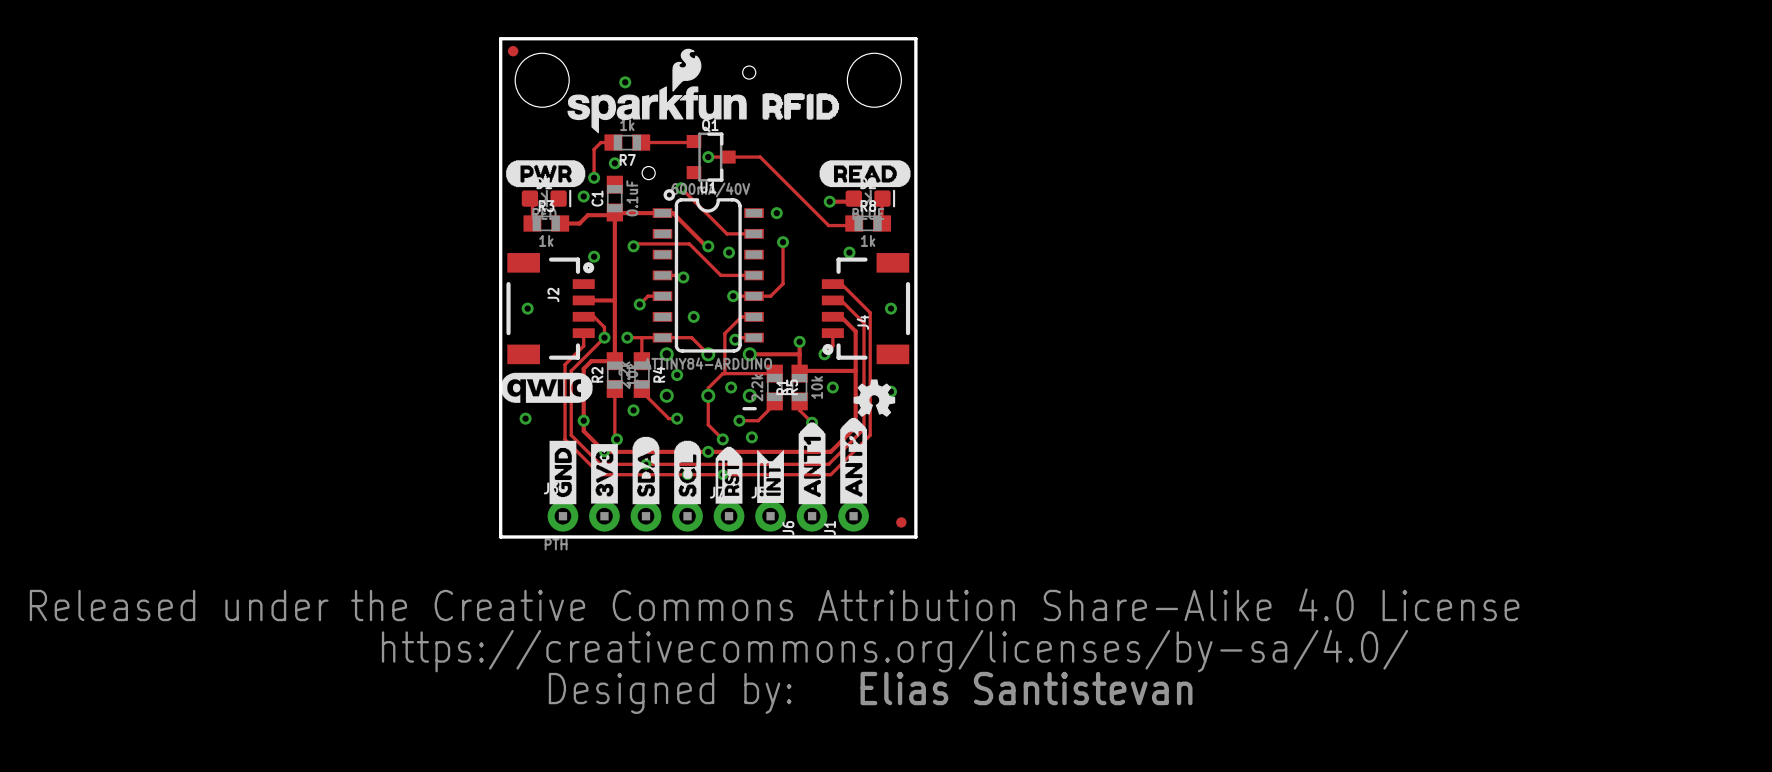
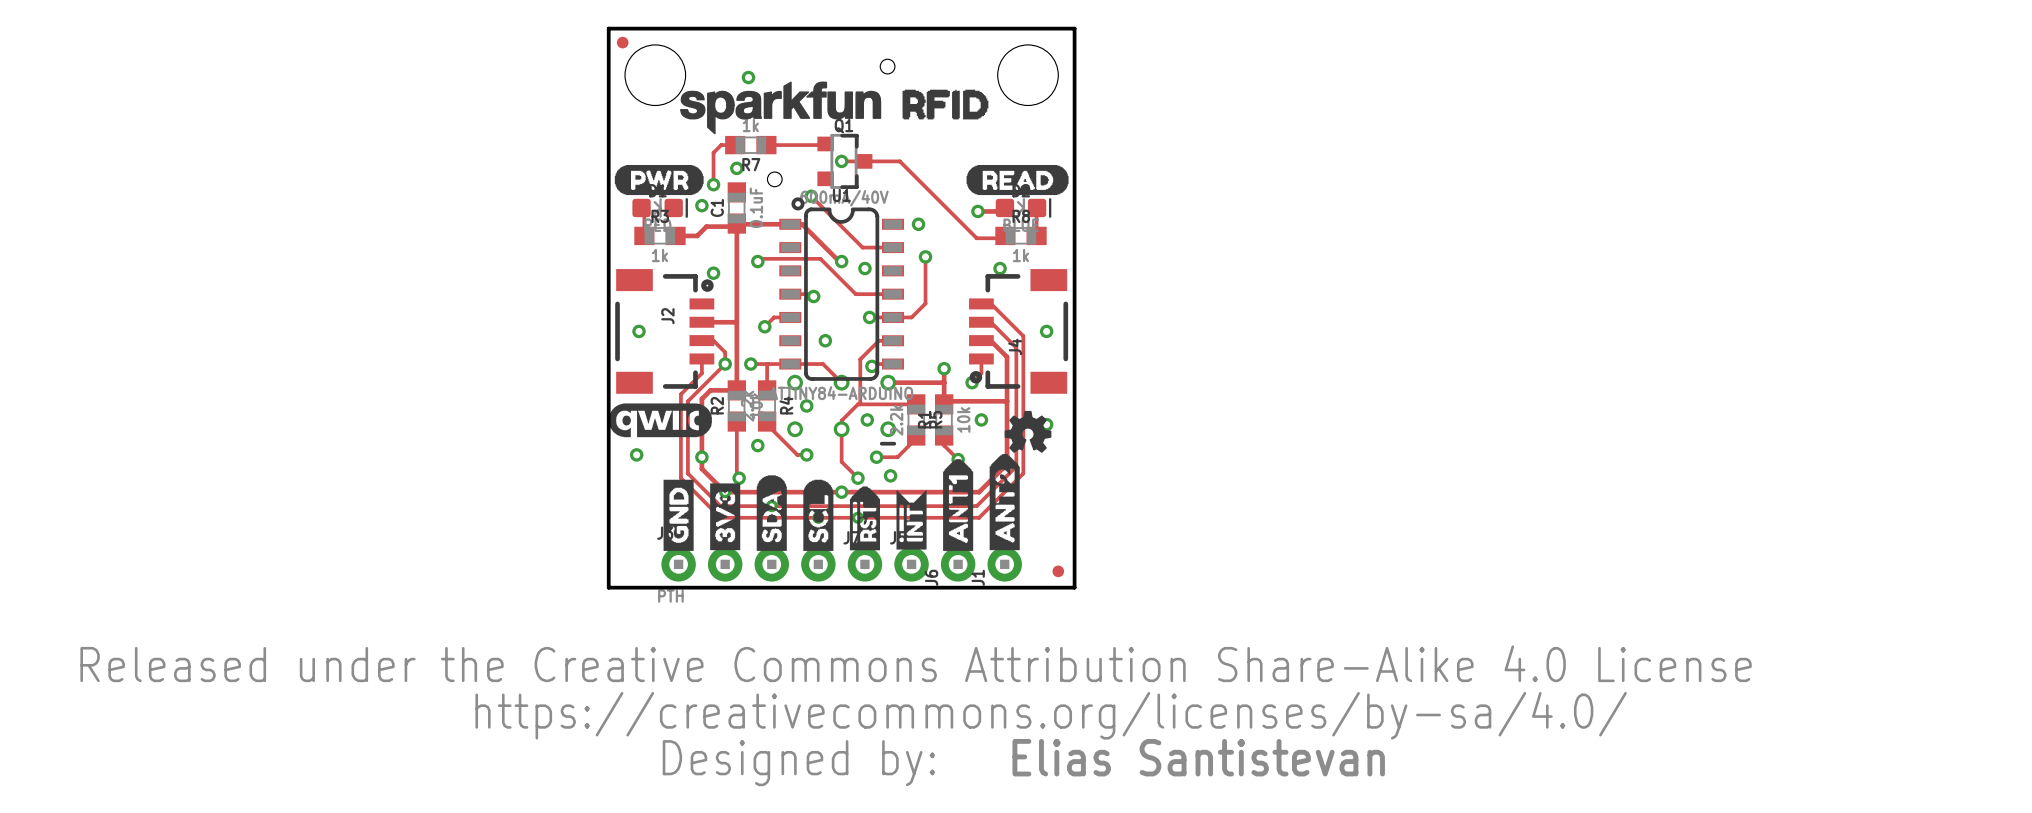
drawing: [567, 48, 747, 134] -> none
drawing: none -> [680, 81, 882, 135]

